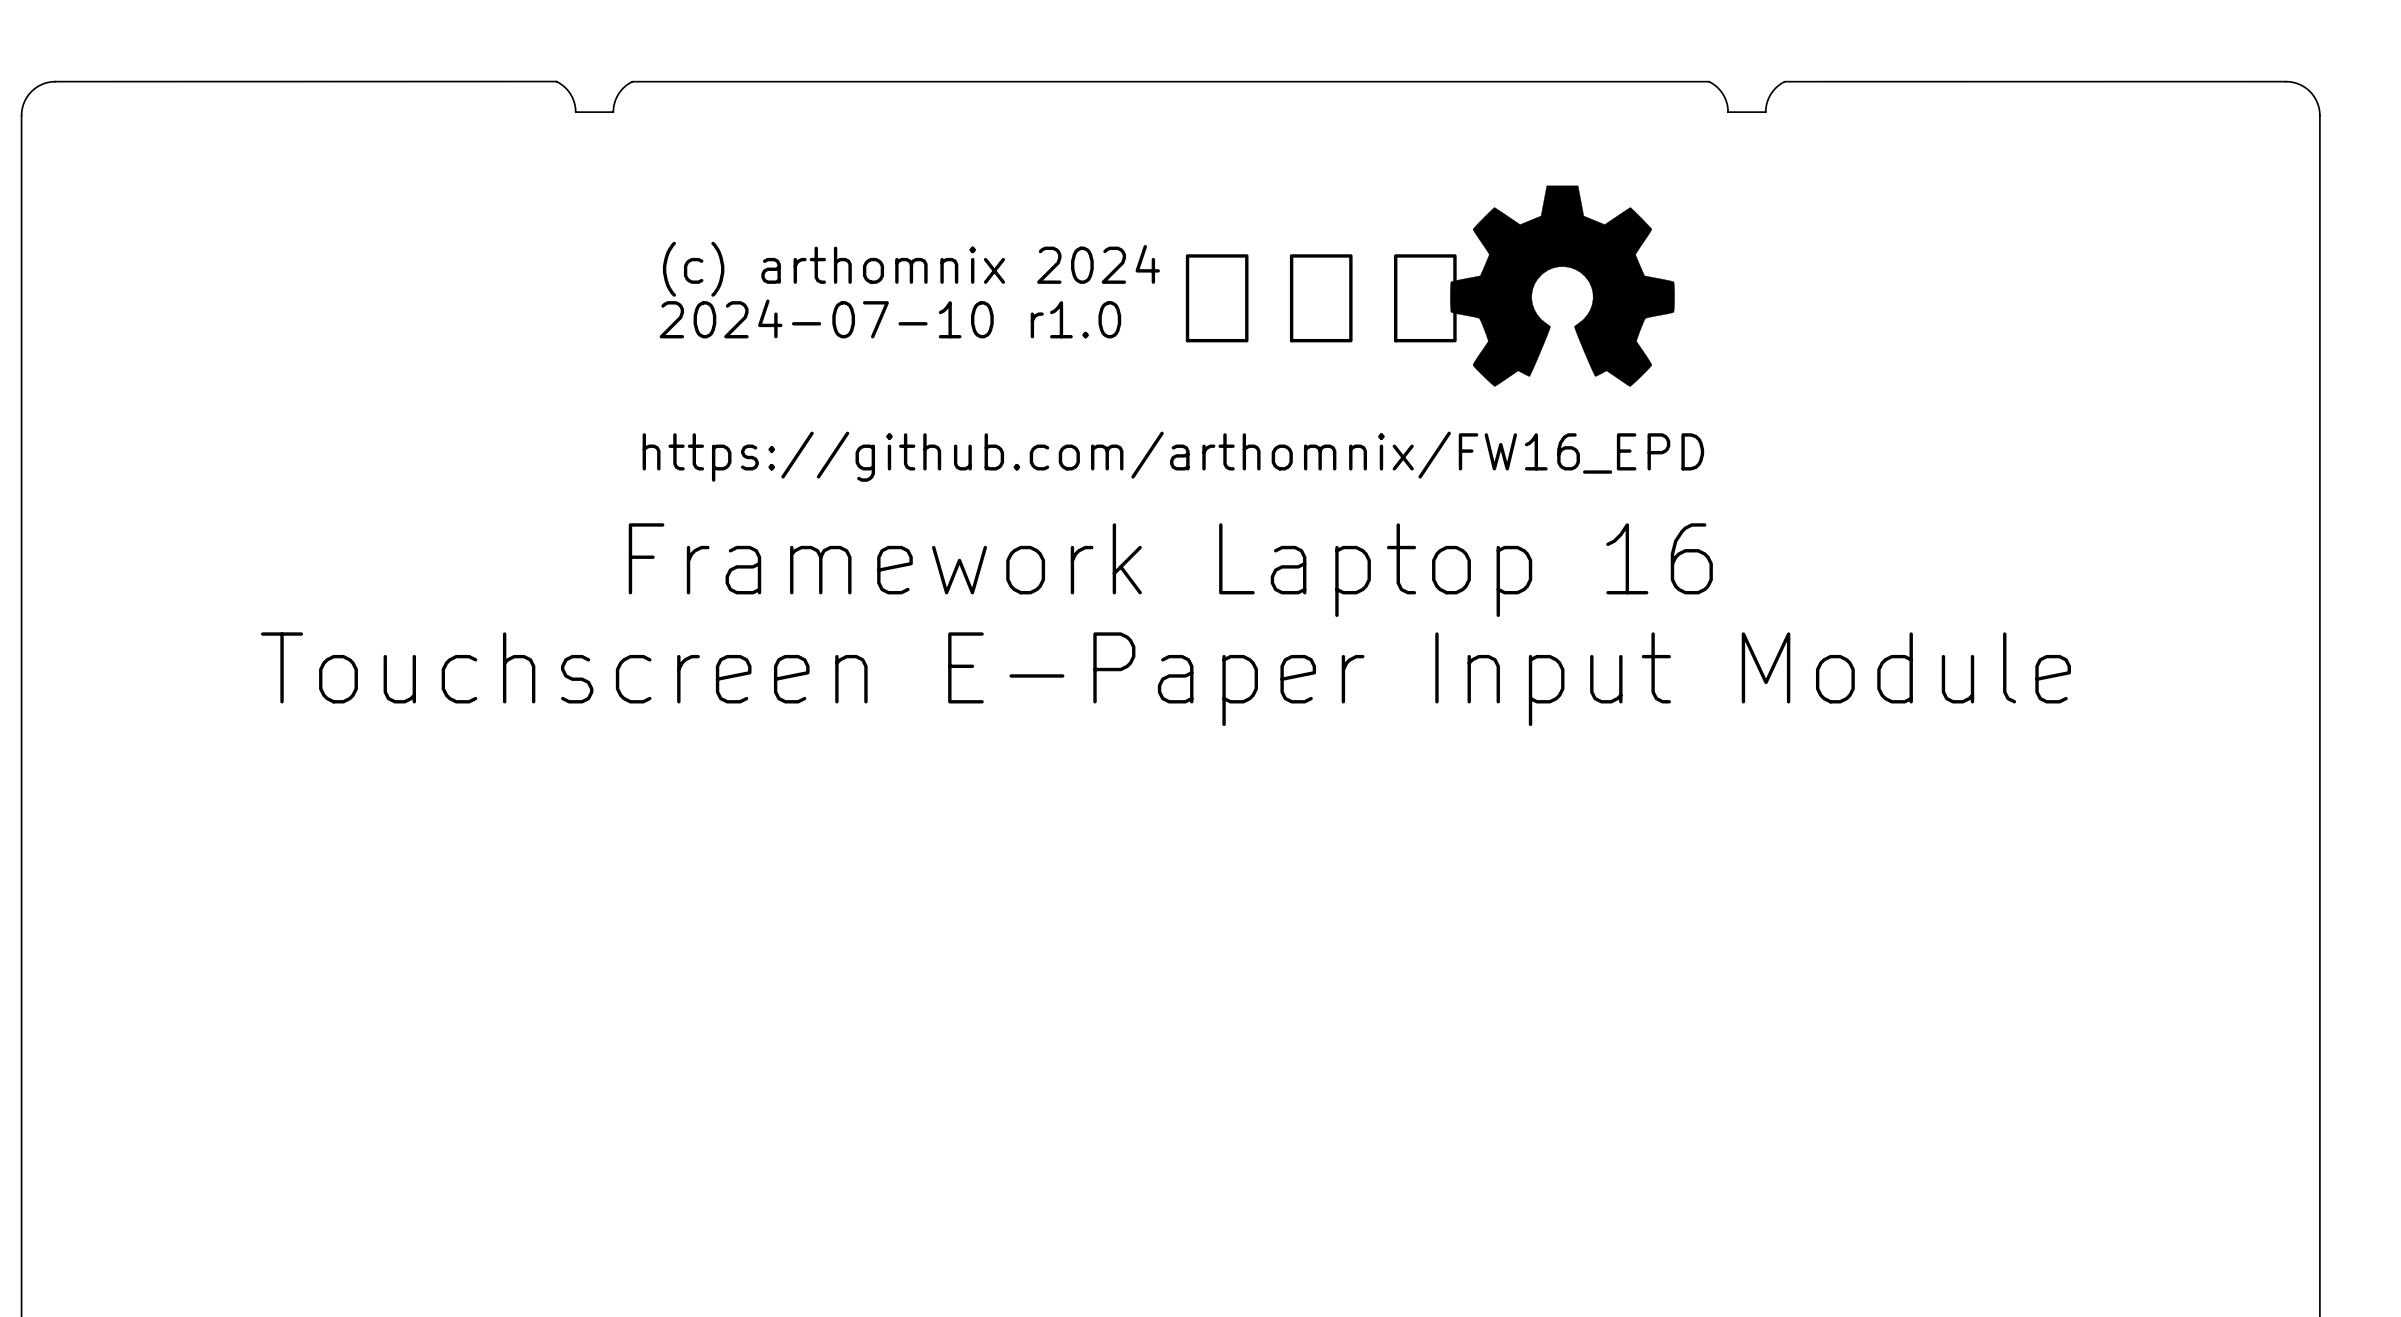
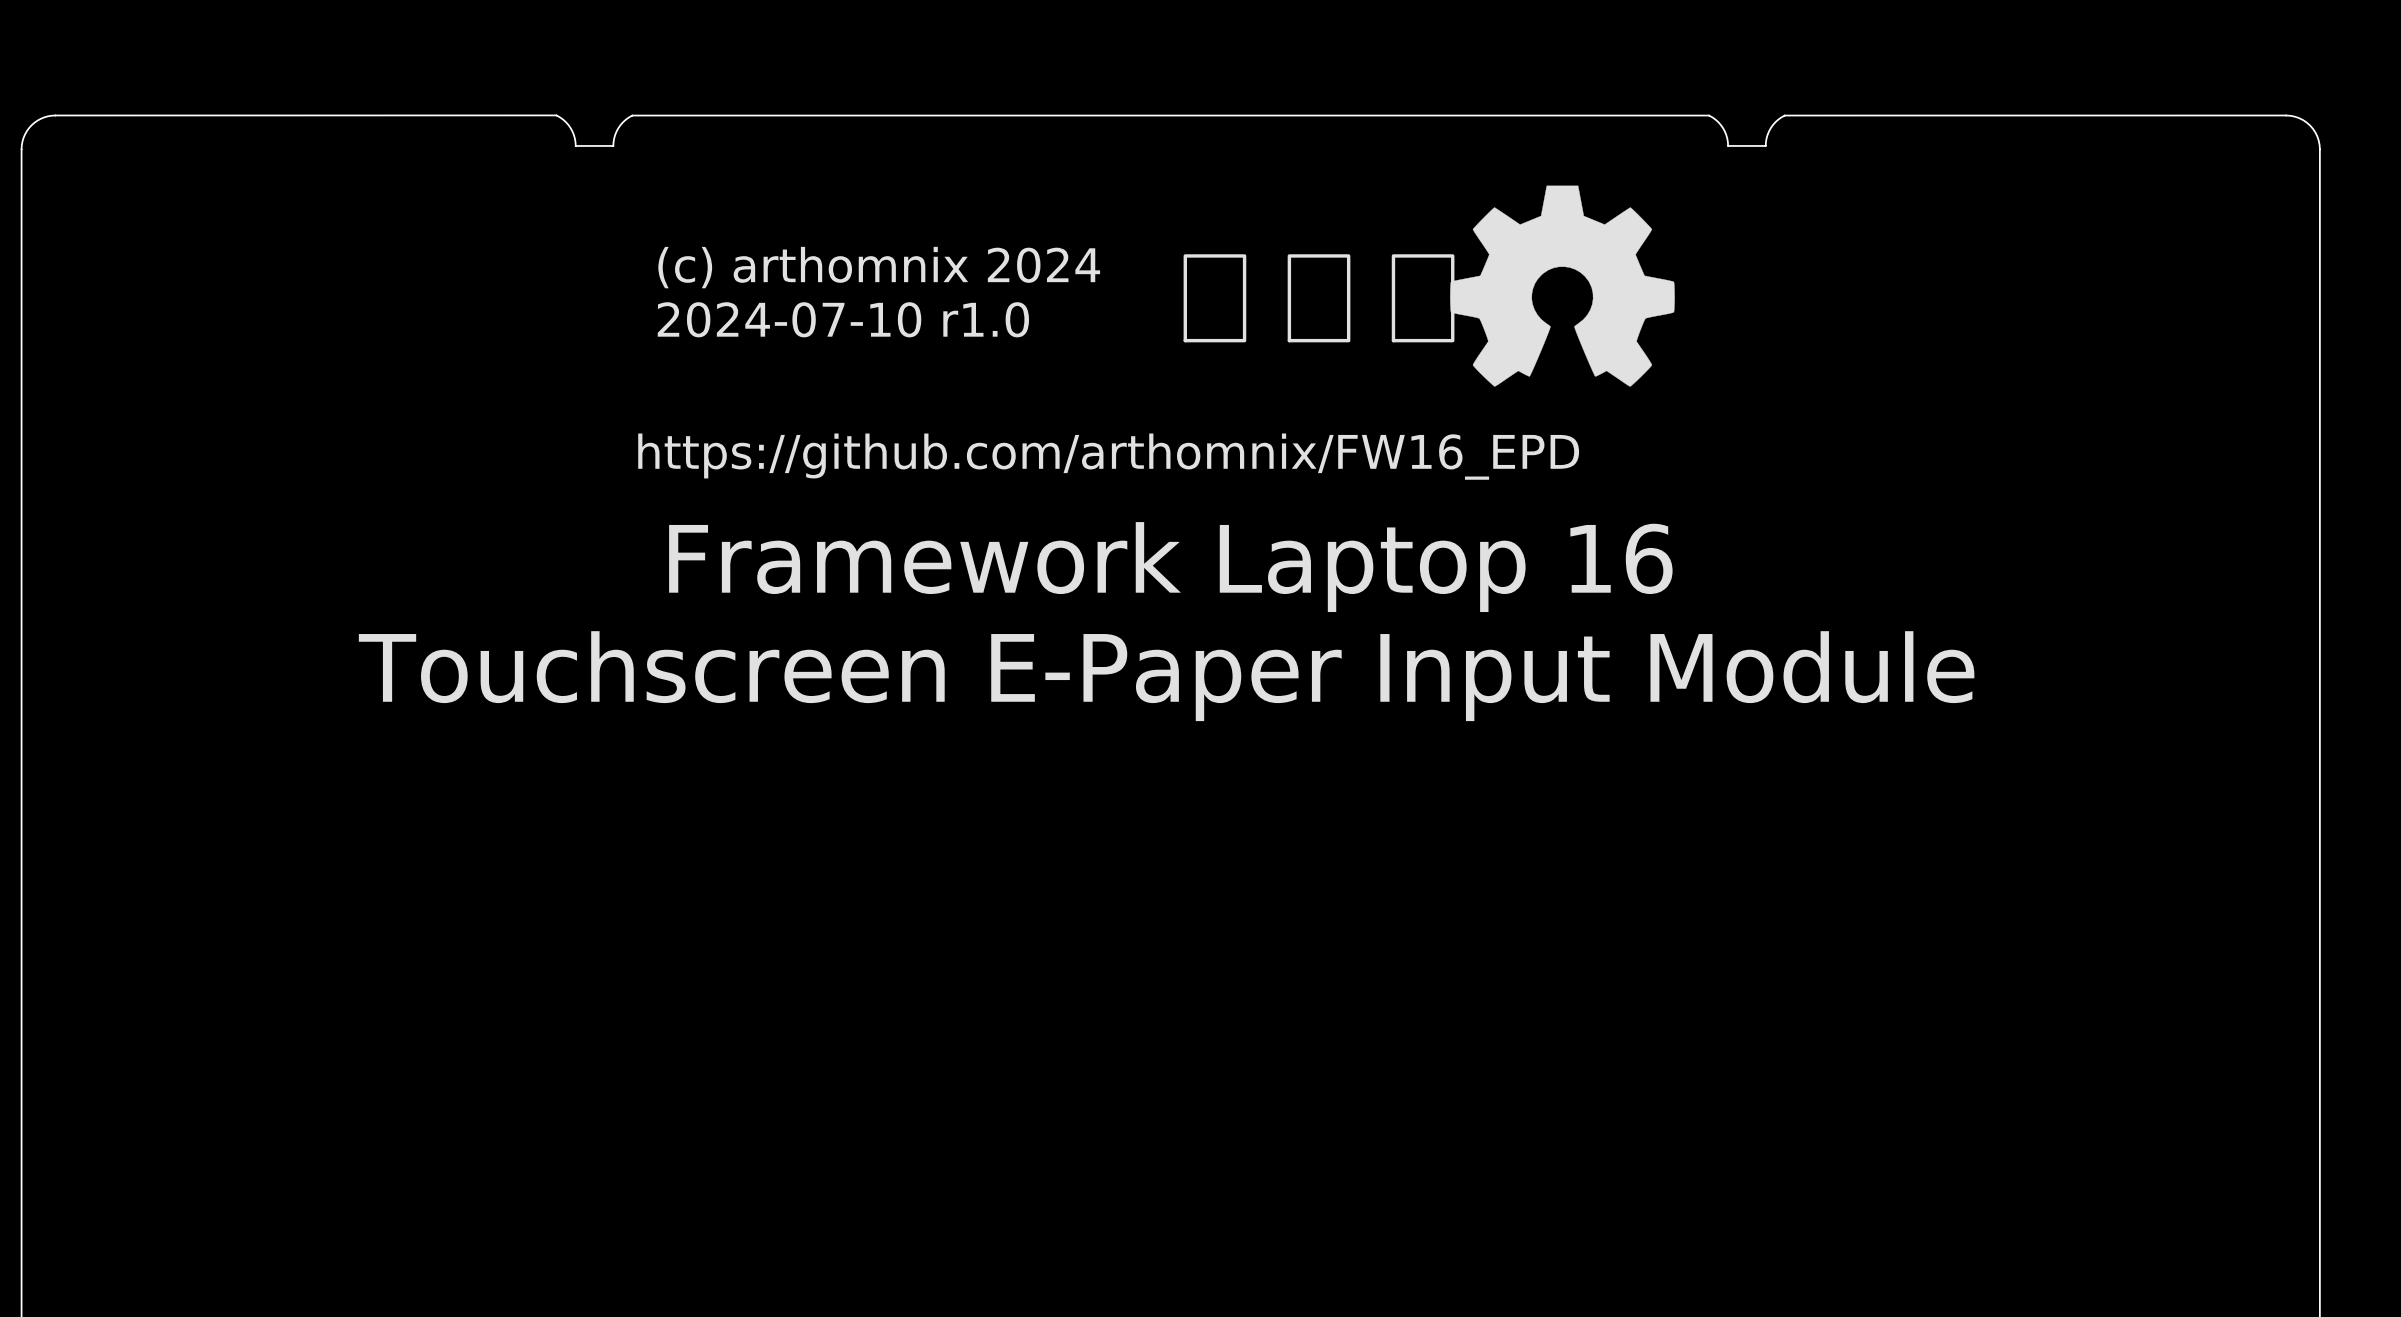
board edge: (21, 149) (21, 111) (24, 100) (34, 89) (51, 81) (556, 81) (570, 94) (575, 112) (613, 112) (618, 94) (632, 81) (1709, 81) (1722, 94) (1728, 112) (1765, 112) (1770, 94) (1784, 81) (2286, 81) (2304, 86) (2316, 100) (2319, 111) (2319, 149) -> (21, 149) (24, 134) (31, 125) (40, 118) (51, 115) (556, 115) (570, 127) (575, 145) (613, 145) (618, 128) (632, 115) (1709, 115) (1722, 128) (1728, 145) (1765, 145) (1770, 128) (1784, 115) (2286, 115) (2298, 118) (2309, 125) (2317, 136) (2319, 149)

